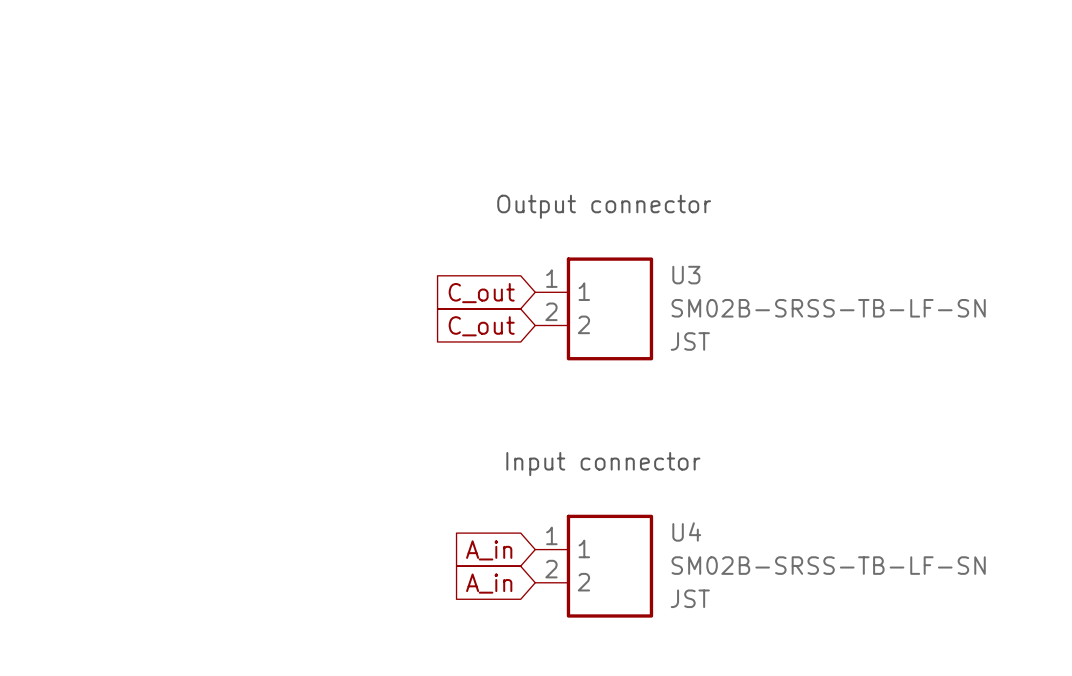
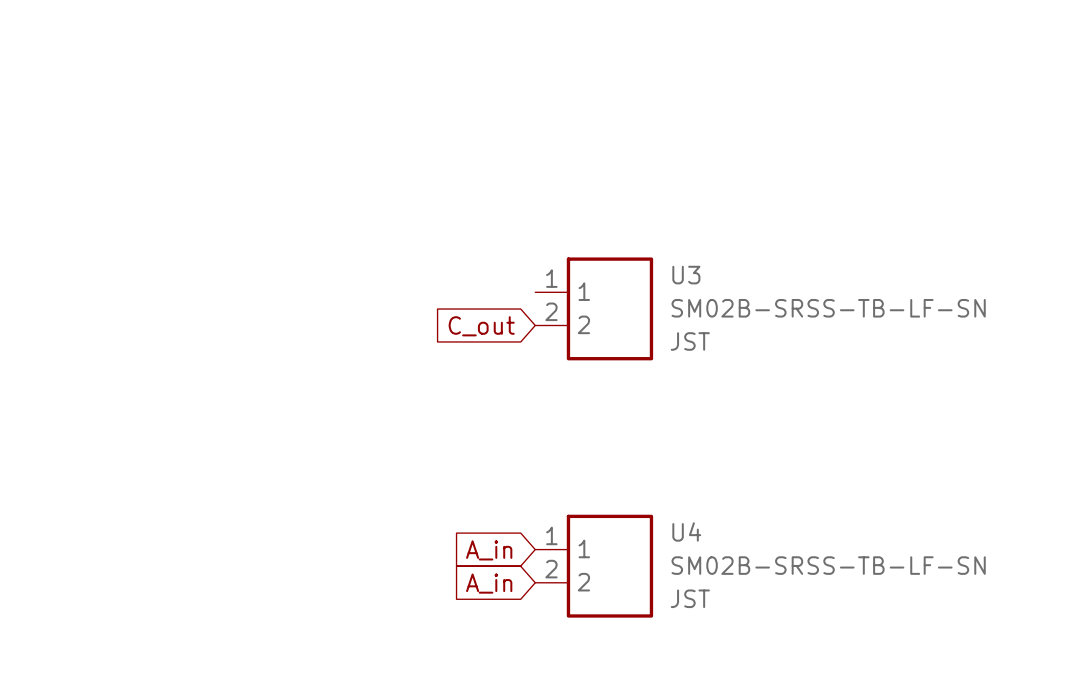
text: Output connector (604, 206) -> none
global label: C_out (481, 293) -> none
text: Input connector (603, 464) -> none

